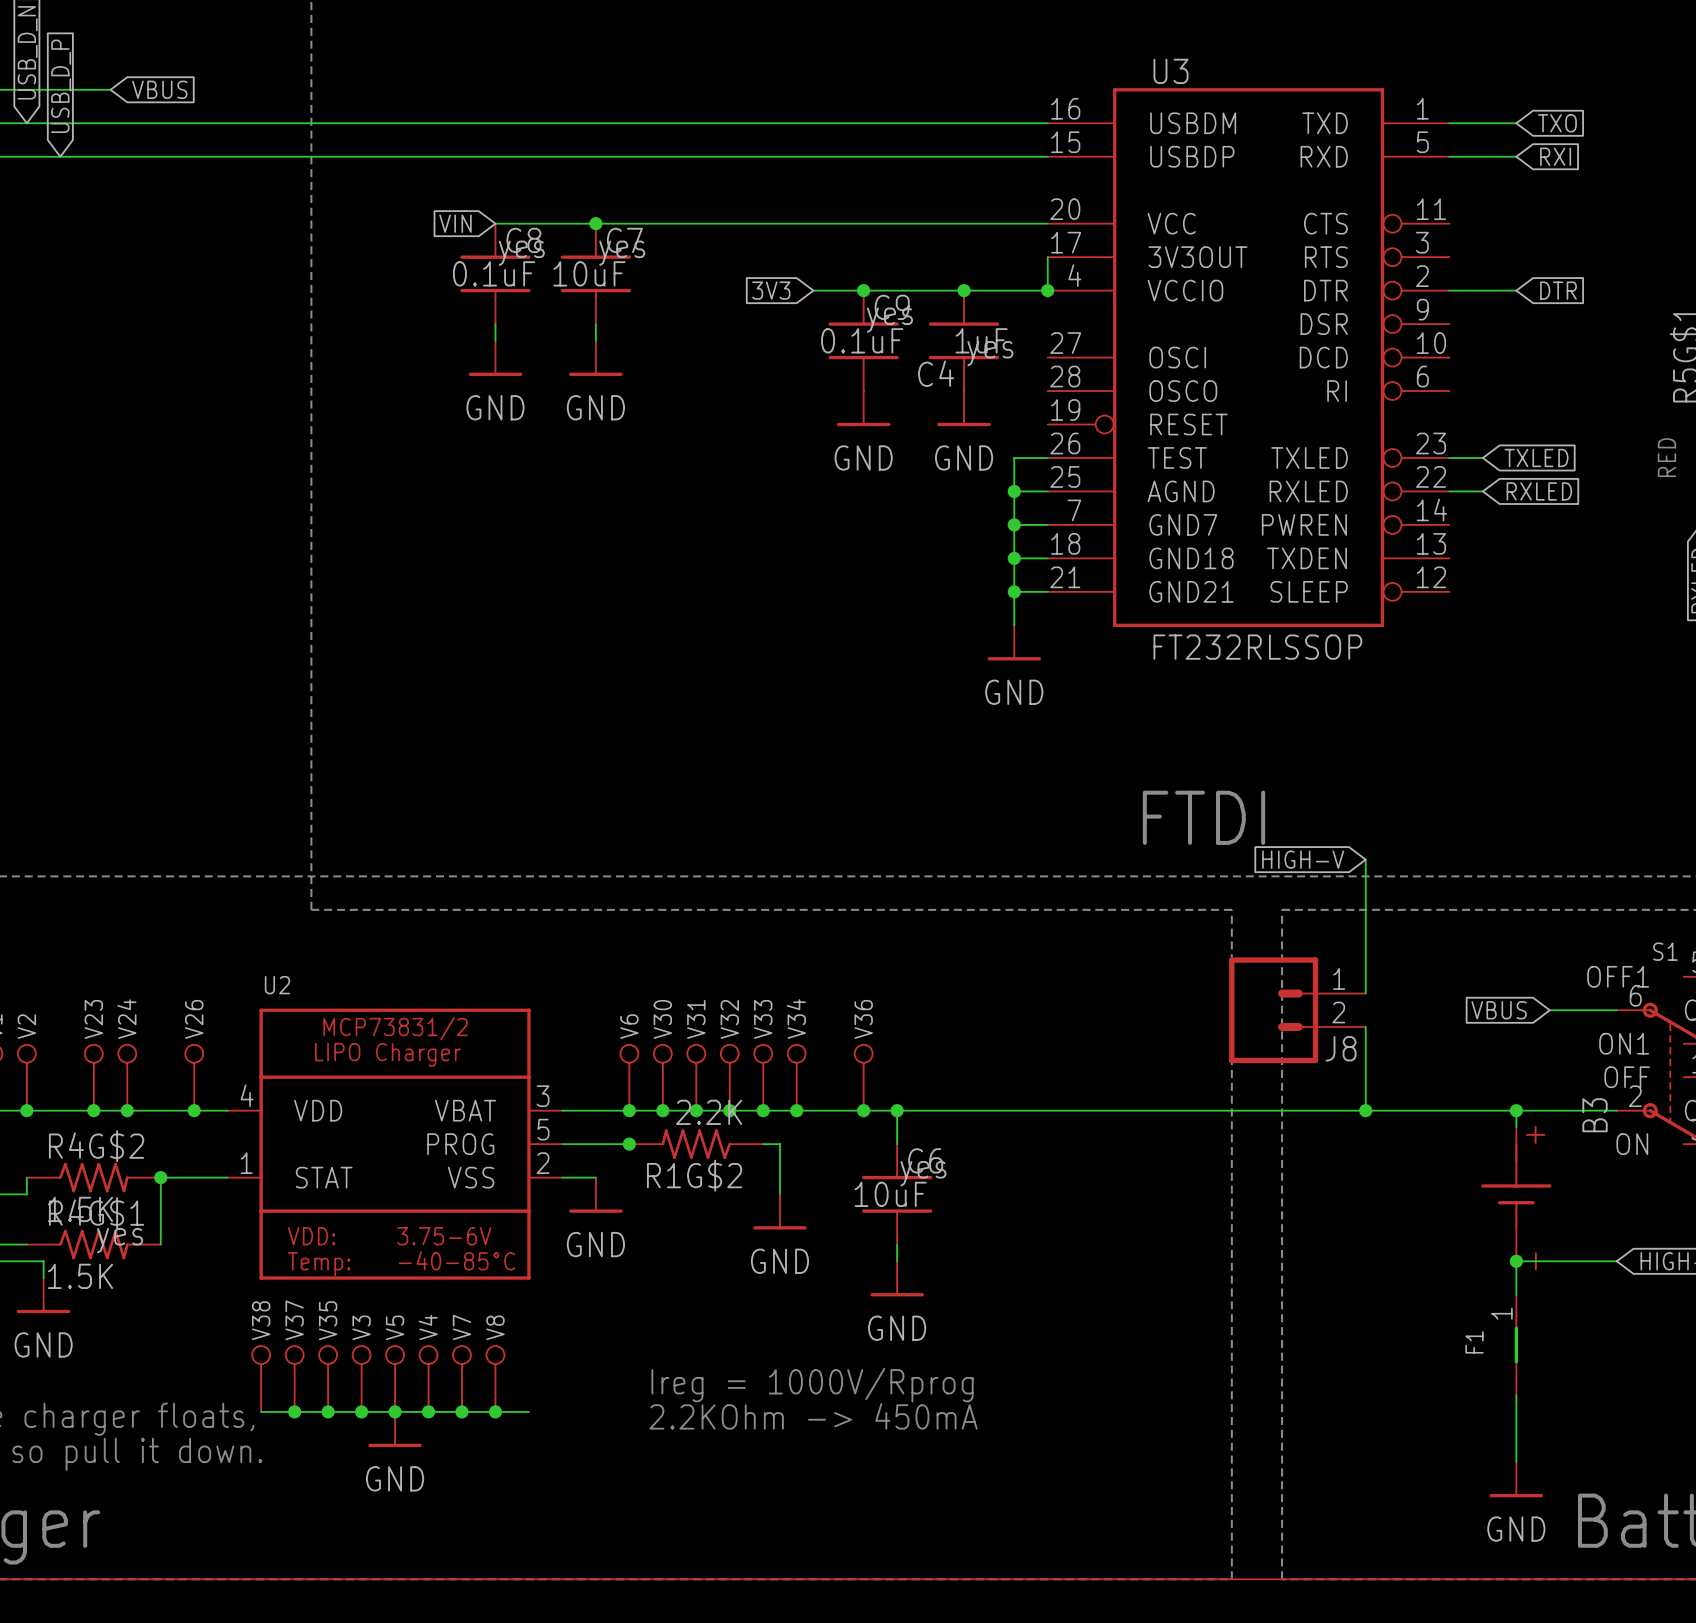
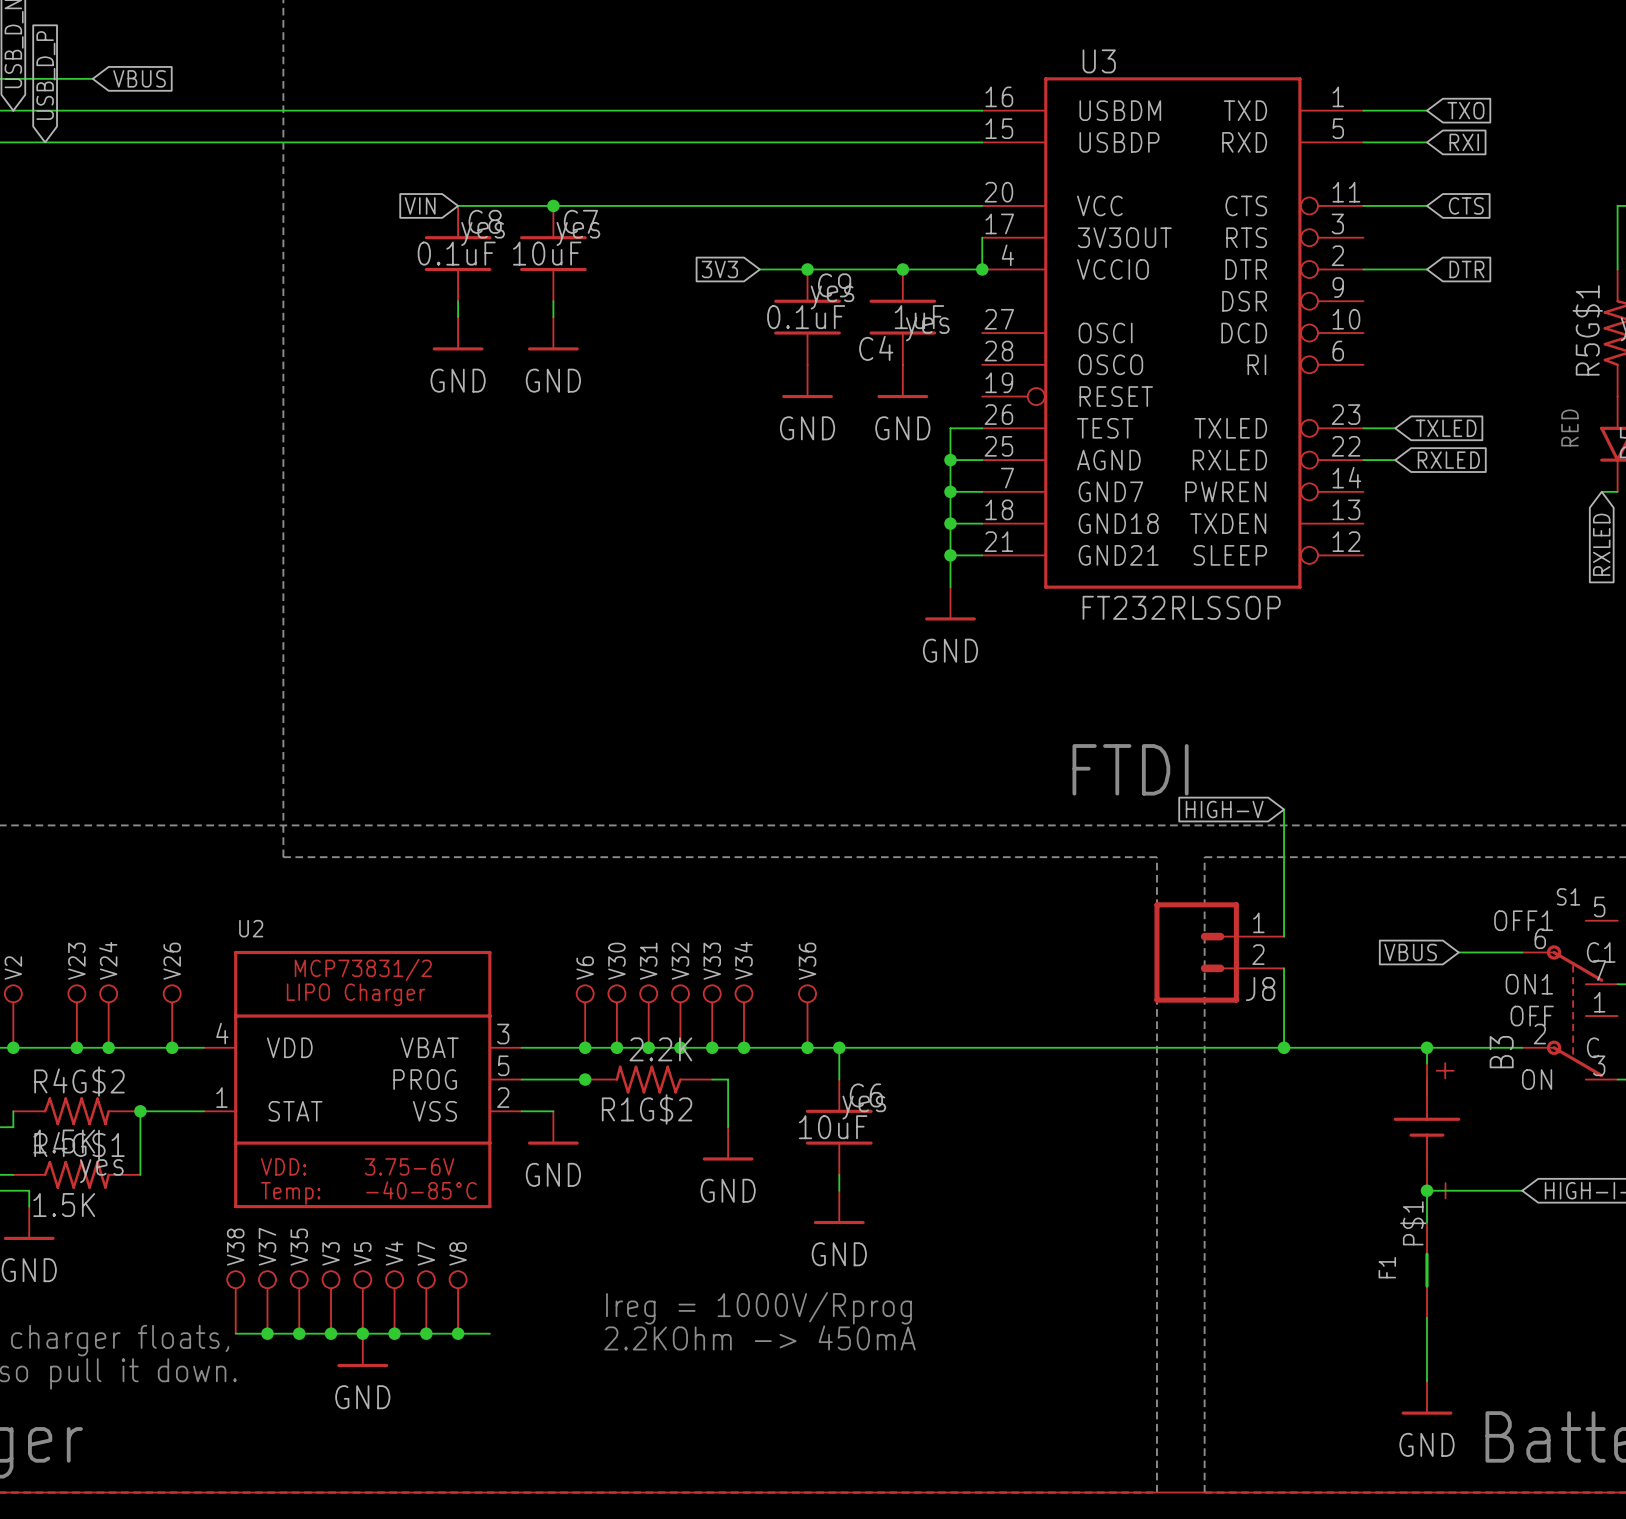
wire: none -> (1363, 205) (1427, 205)
global label: none -> CTS (1466, 205)
F1 pin number: 1 (1501, 1313) -> P$1 (1413, 1223)

